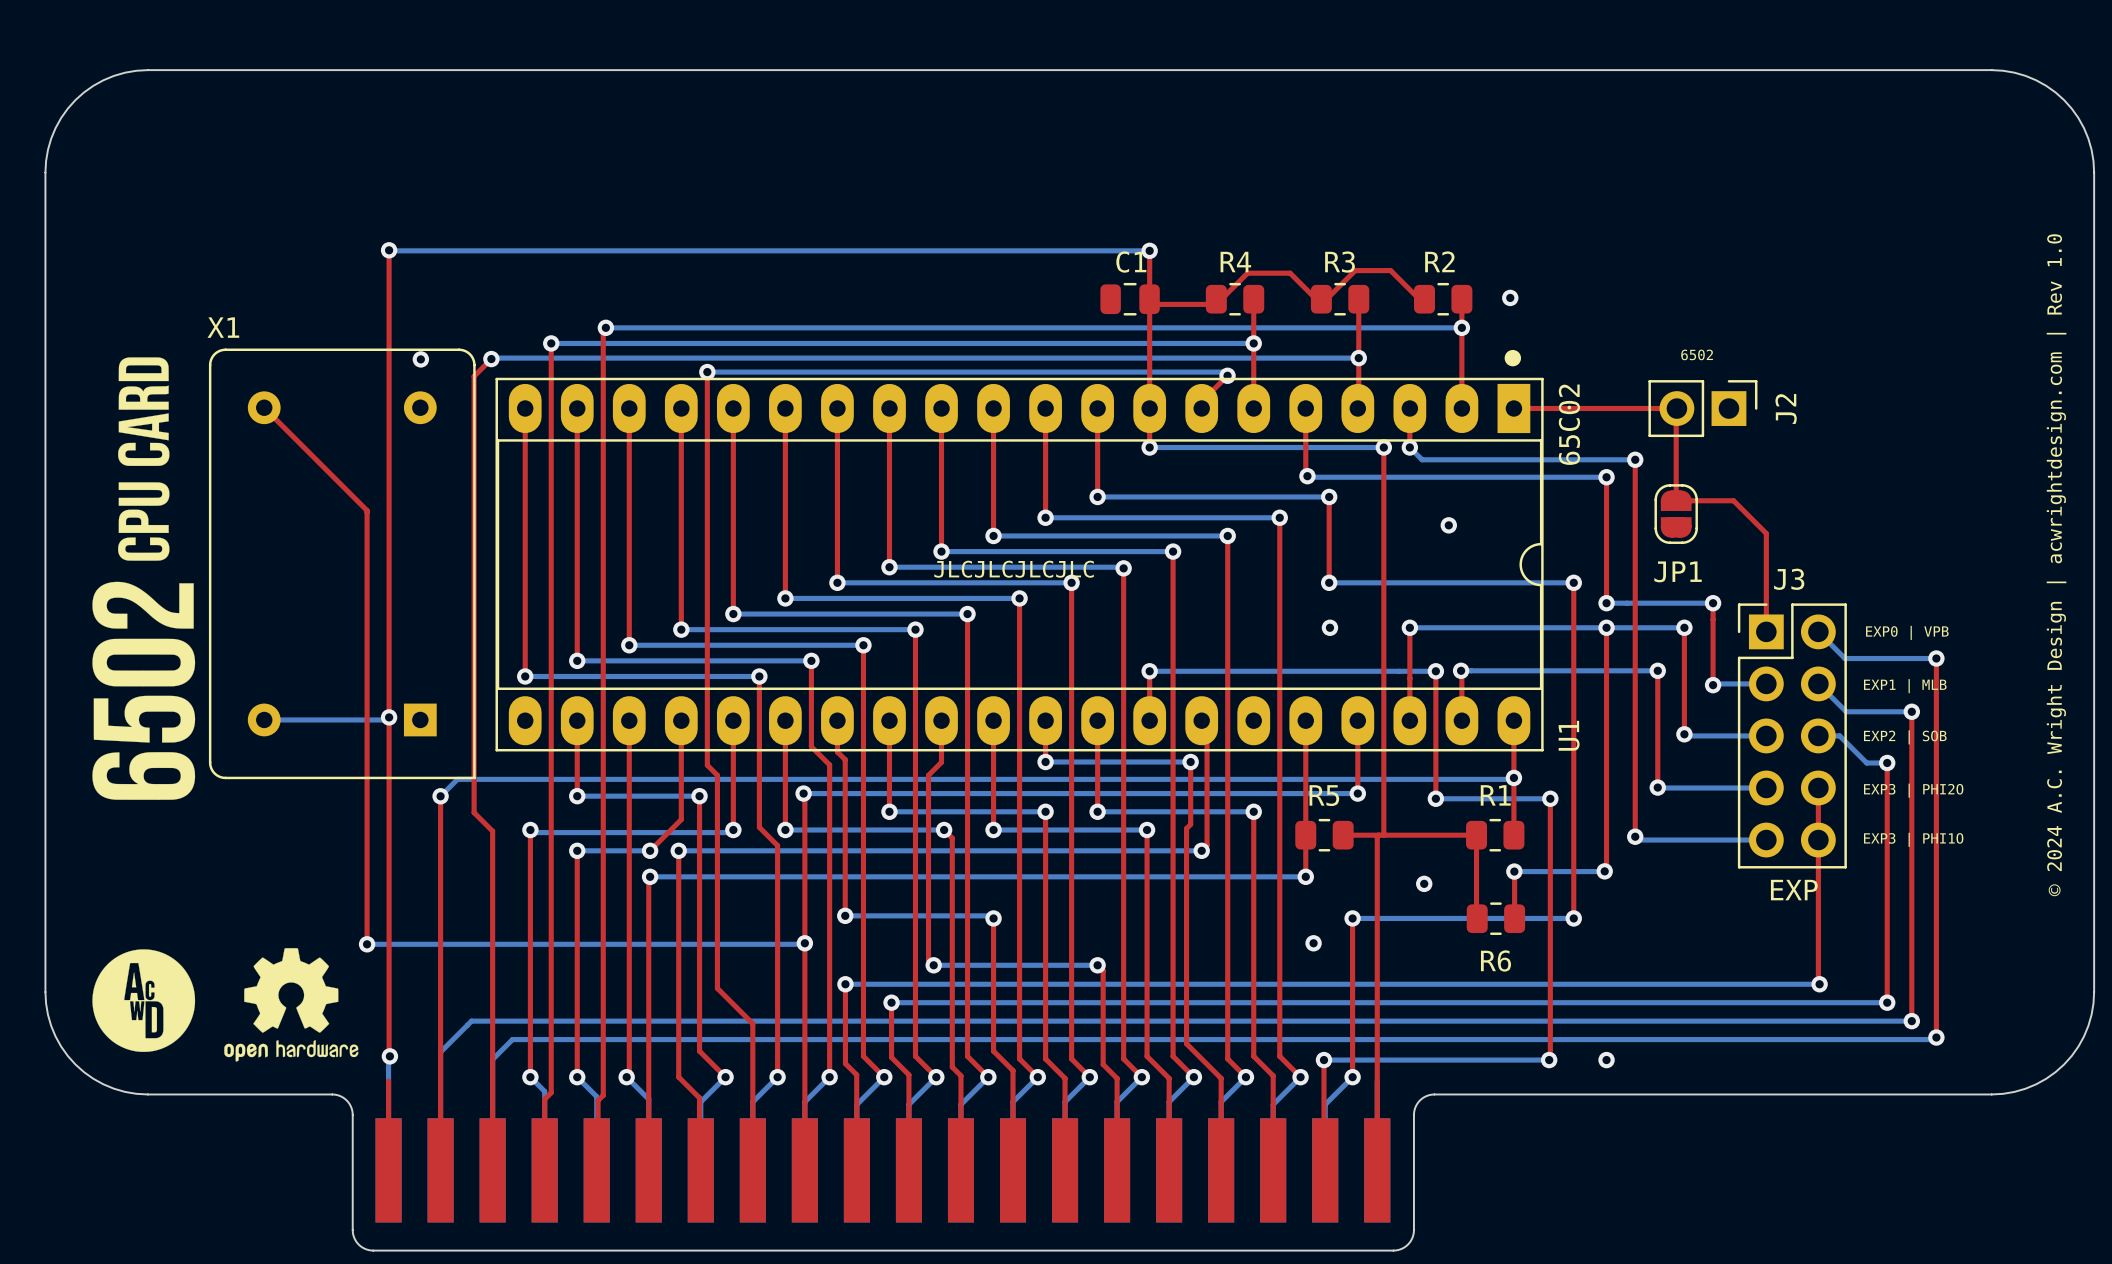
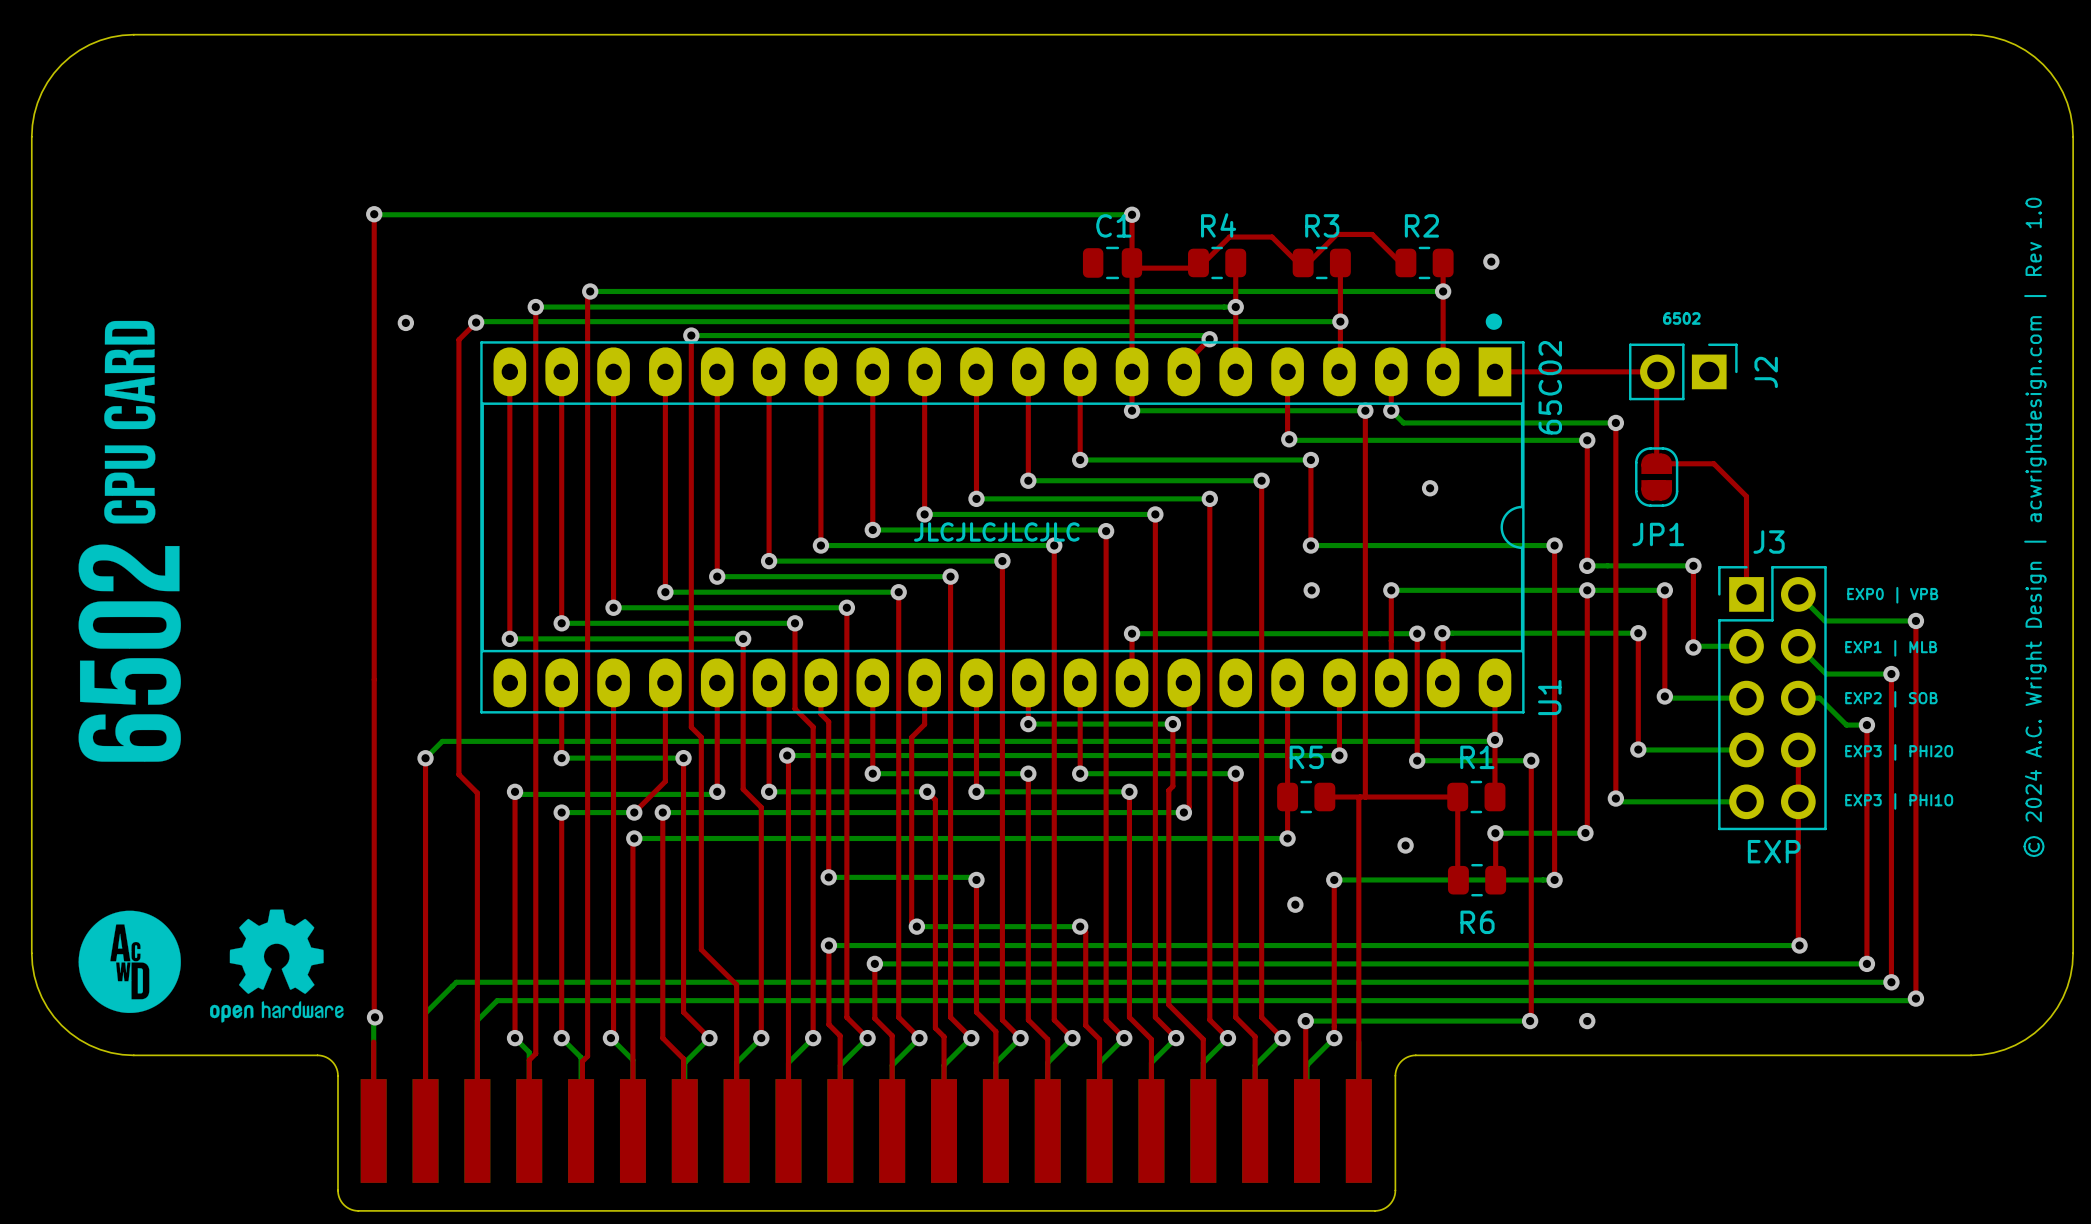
top track: (264, 407) (367, 510) (367, 944) -> none
X1: (342, 563) -> none
bottom track: (389, 717) (386, 719) (264, 719) -> none
via: (389, 717) -> none
bottom track: (804, 943) (367, 944) -> none
via: (804, 943) -> none
via: (367, 944) -> none

